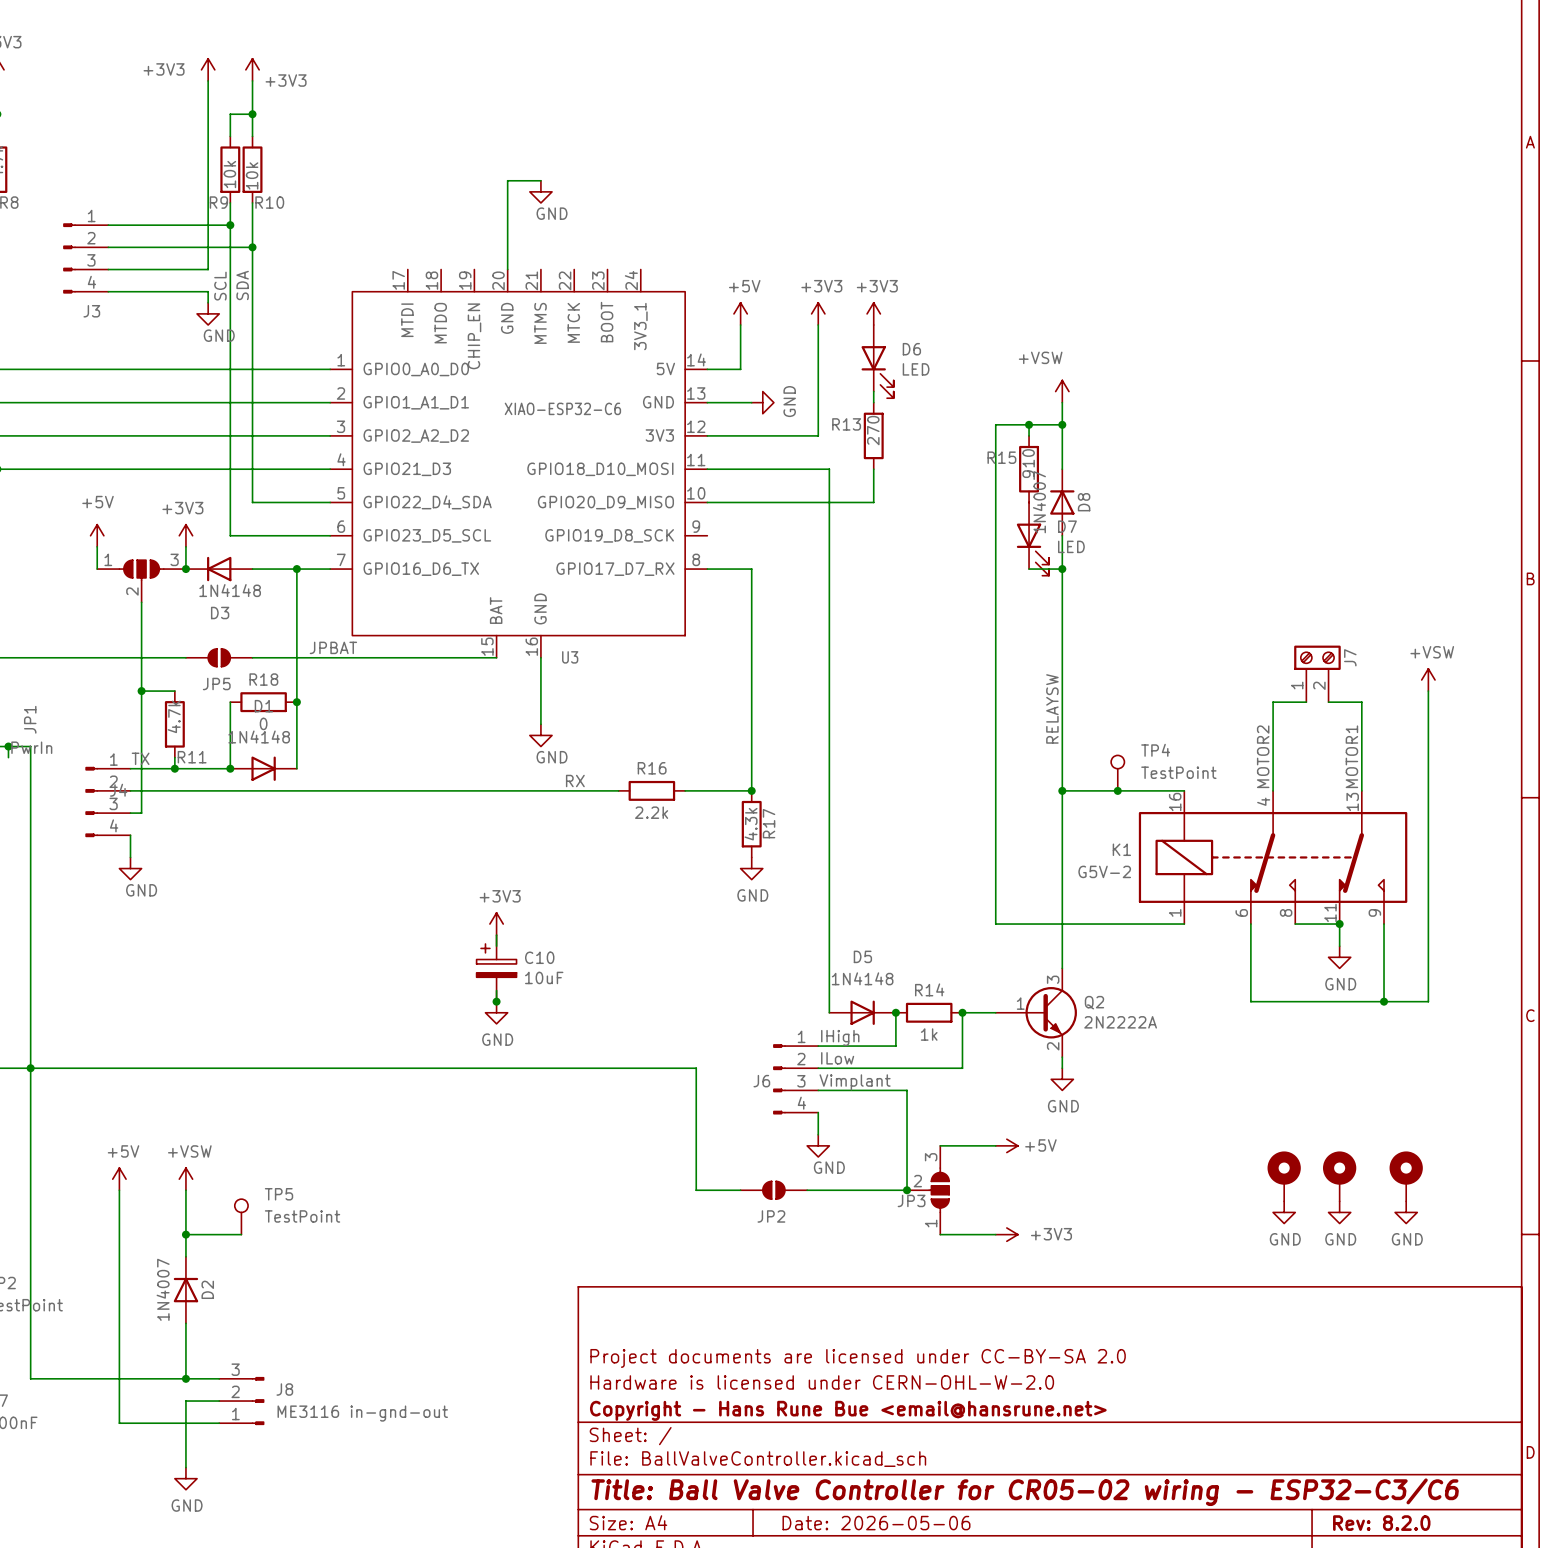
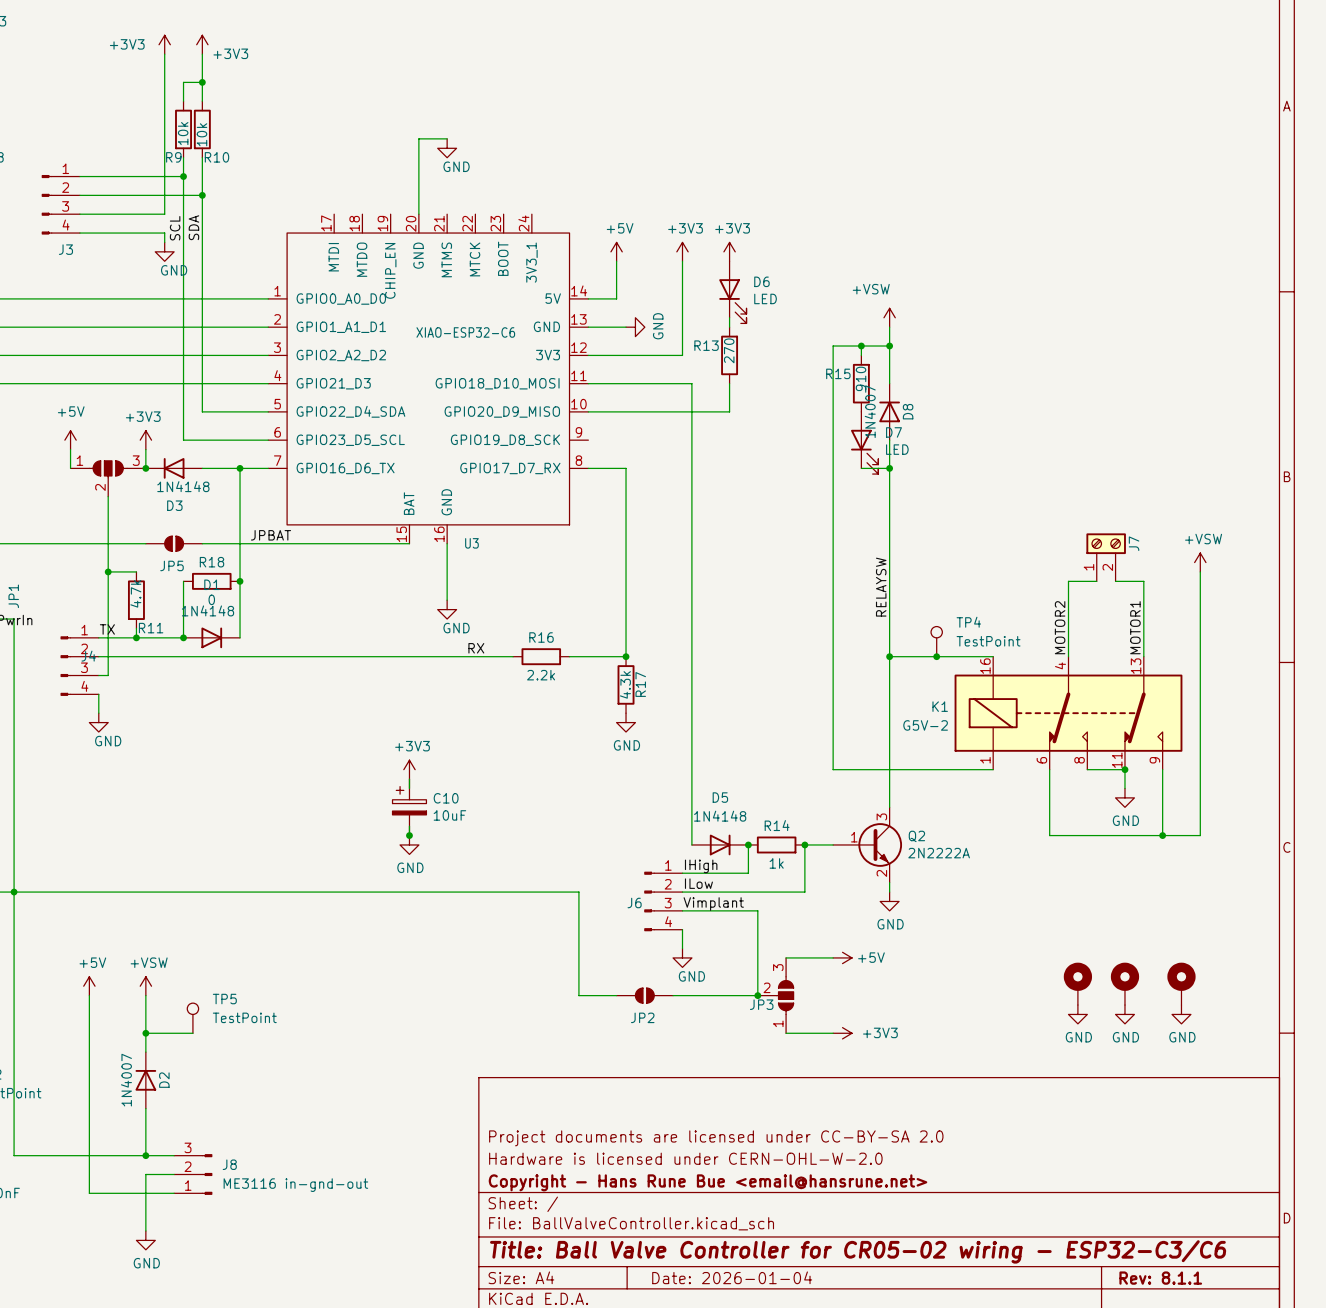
title block: Date: 2026-05-06 (876, 1523) -> Date: 2026-01-04 (732, 1277)
title block: Rev: 8.2.0 (1381, 1523) -> Rev: 8.1.1 (1160, 1278)

